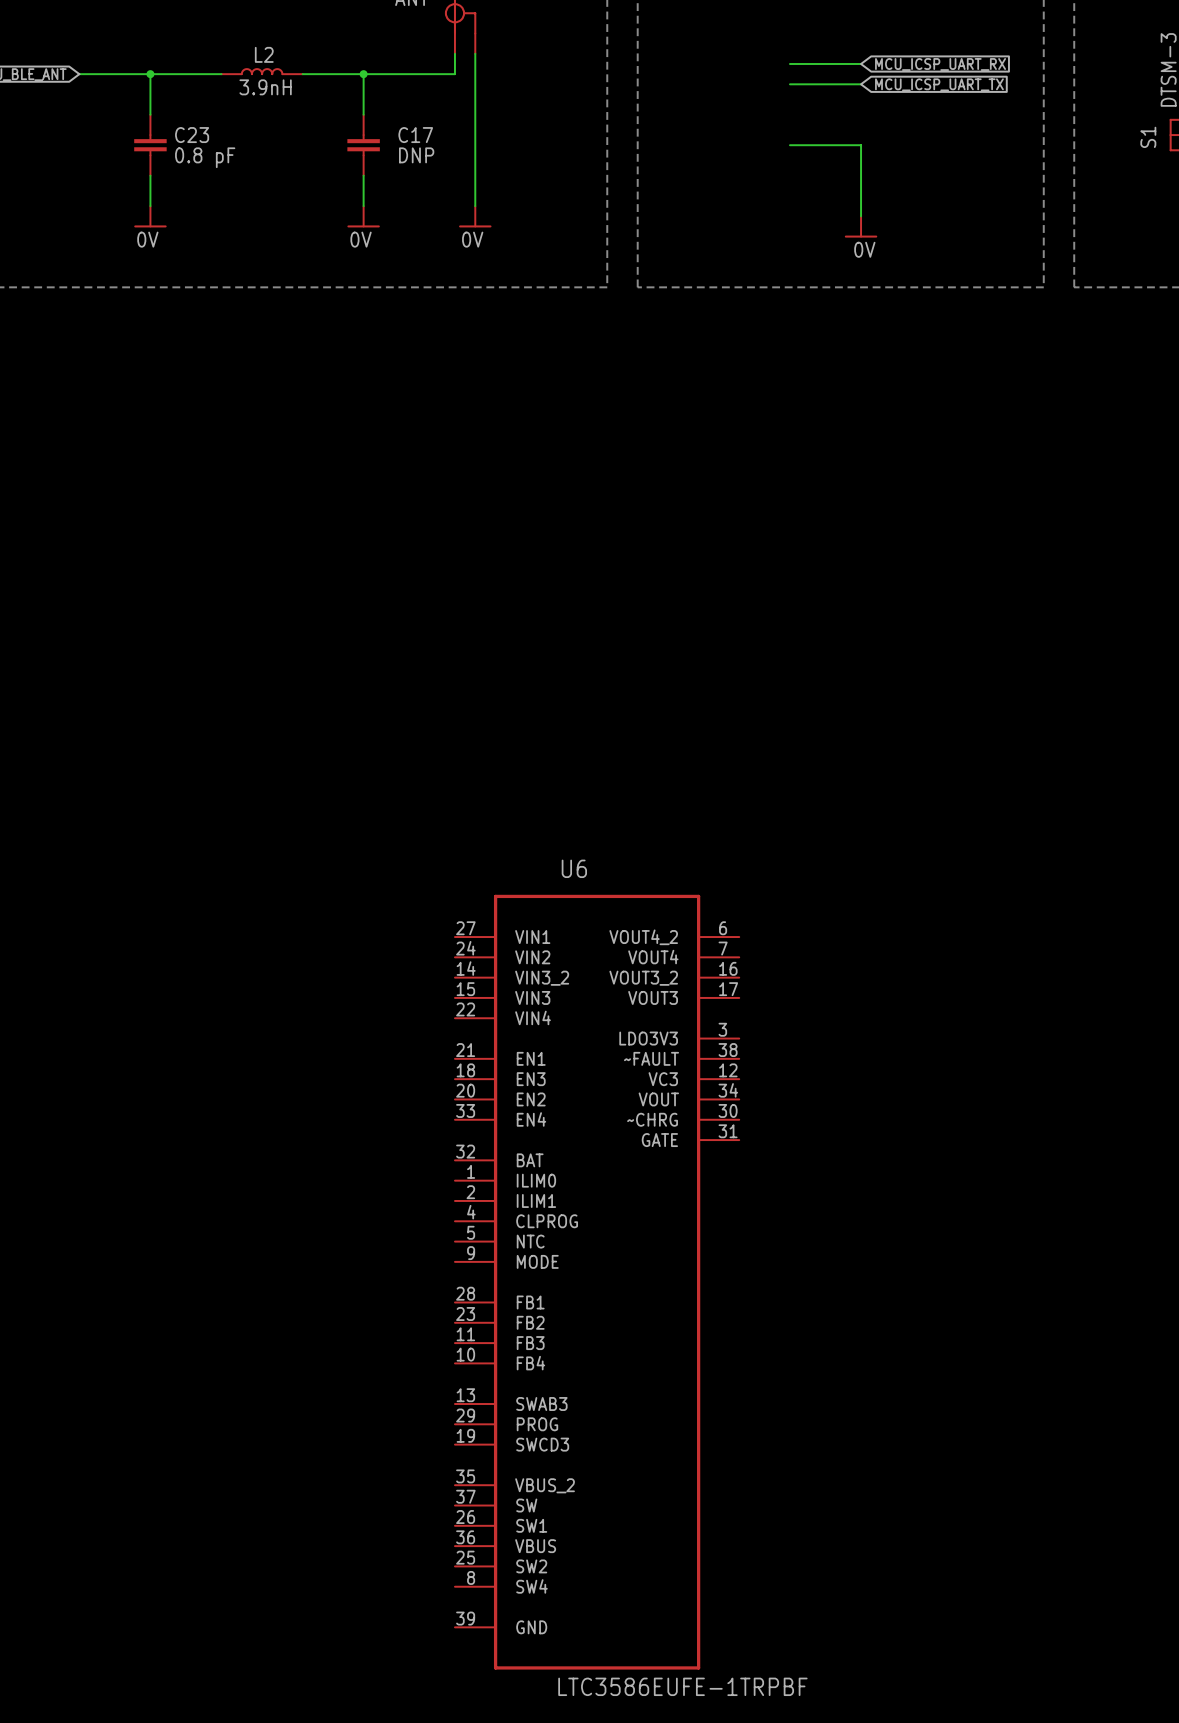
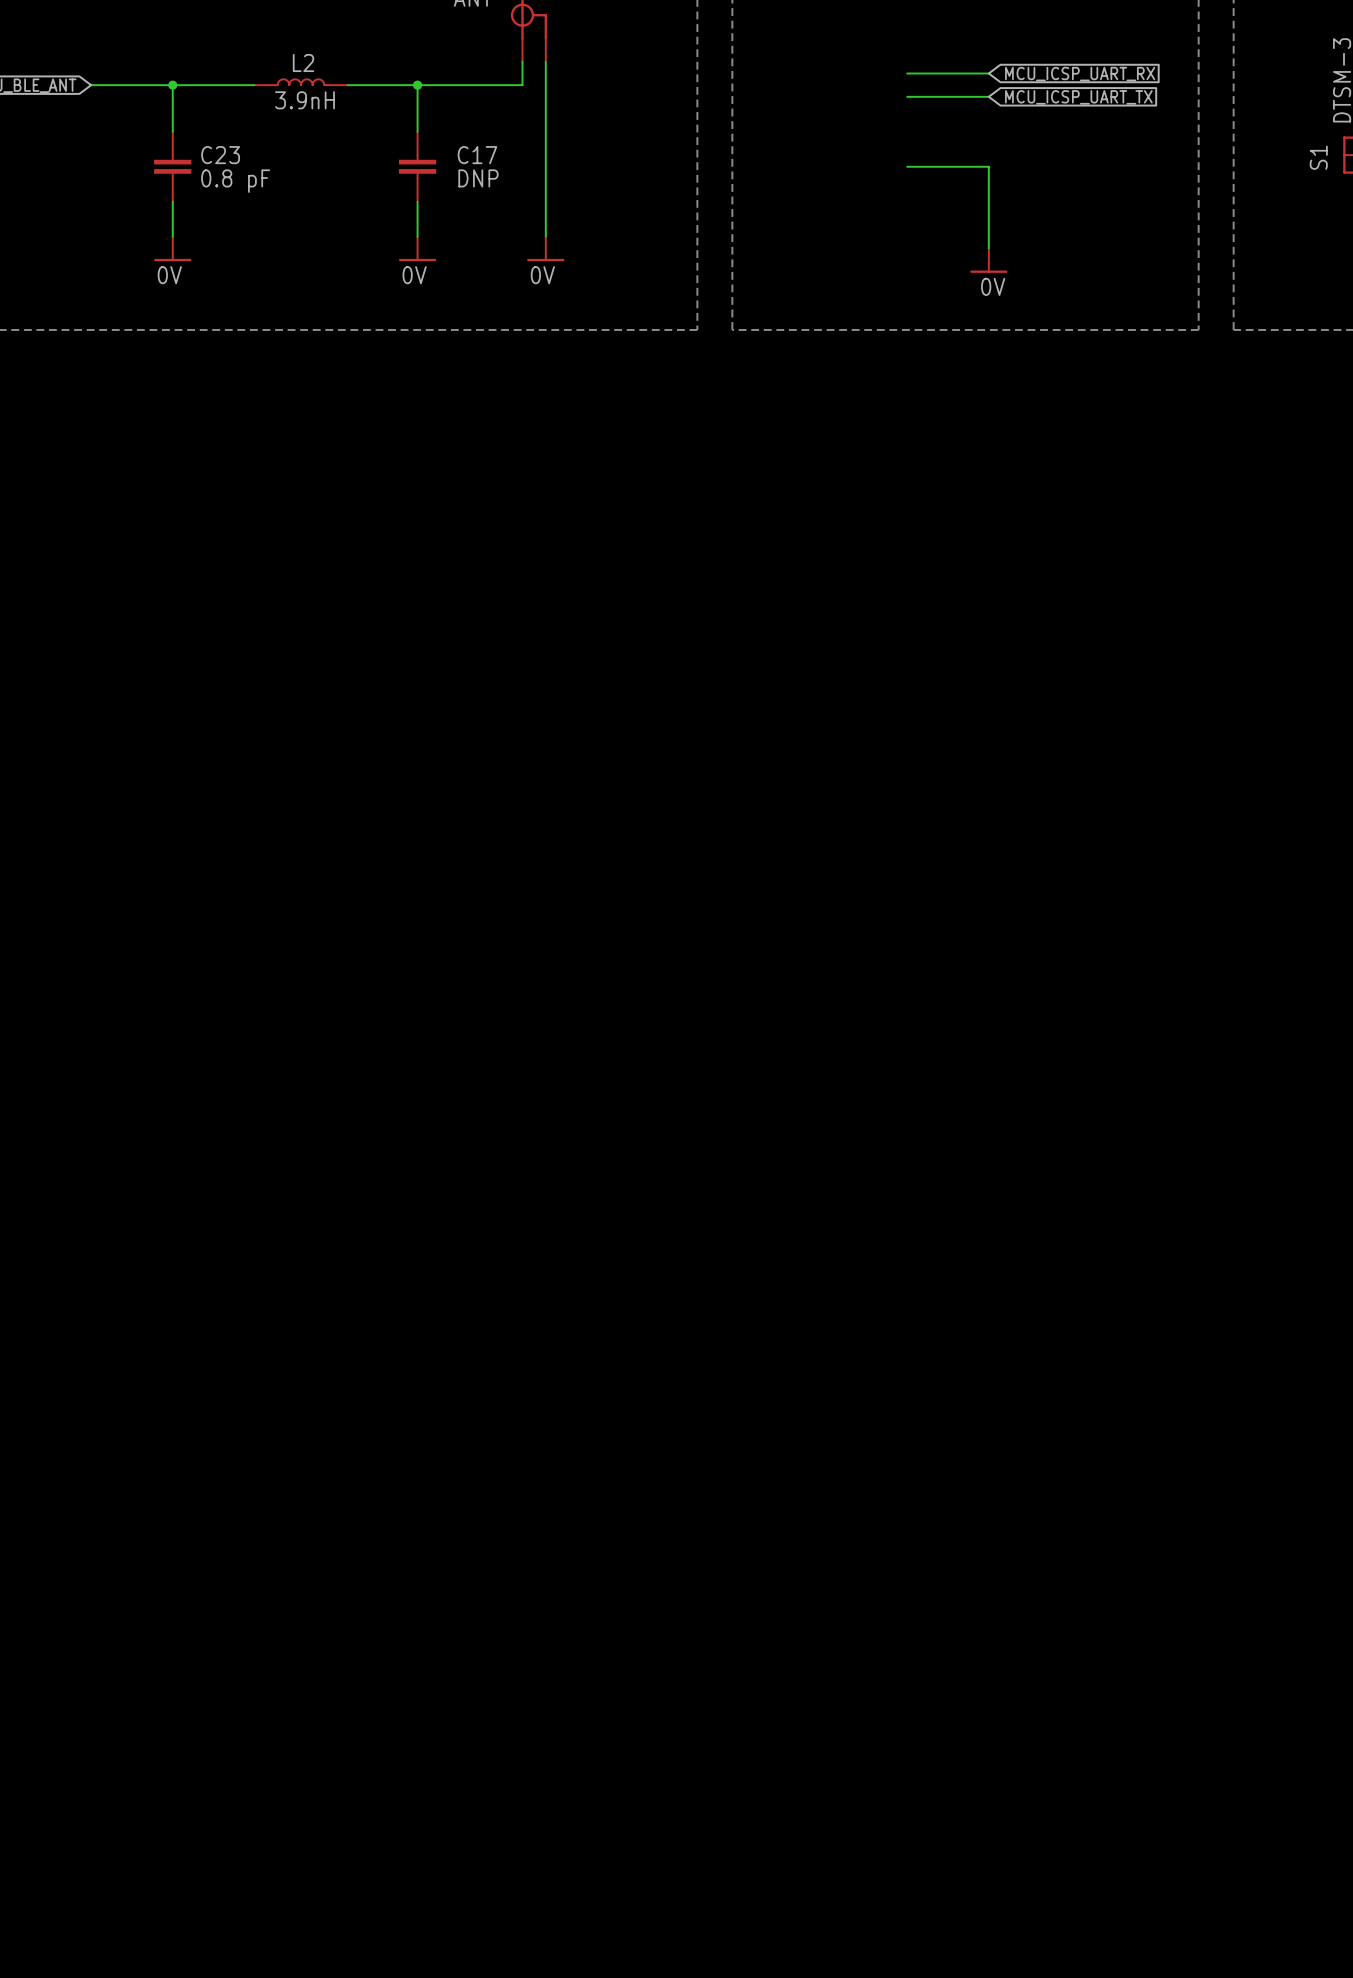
U6: LTC3586EUFE-1TRPBF (597, 1282) -> none

